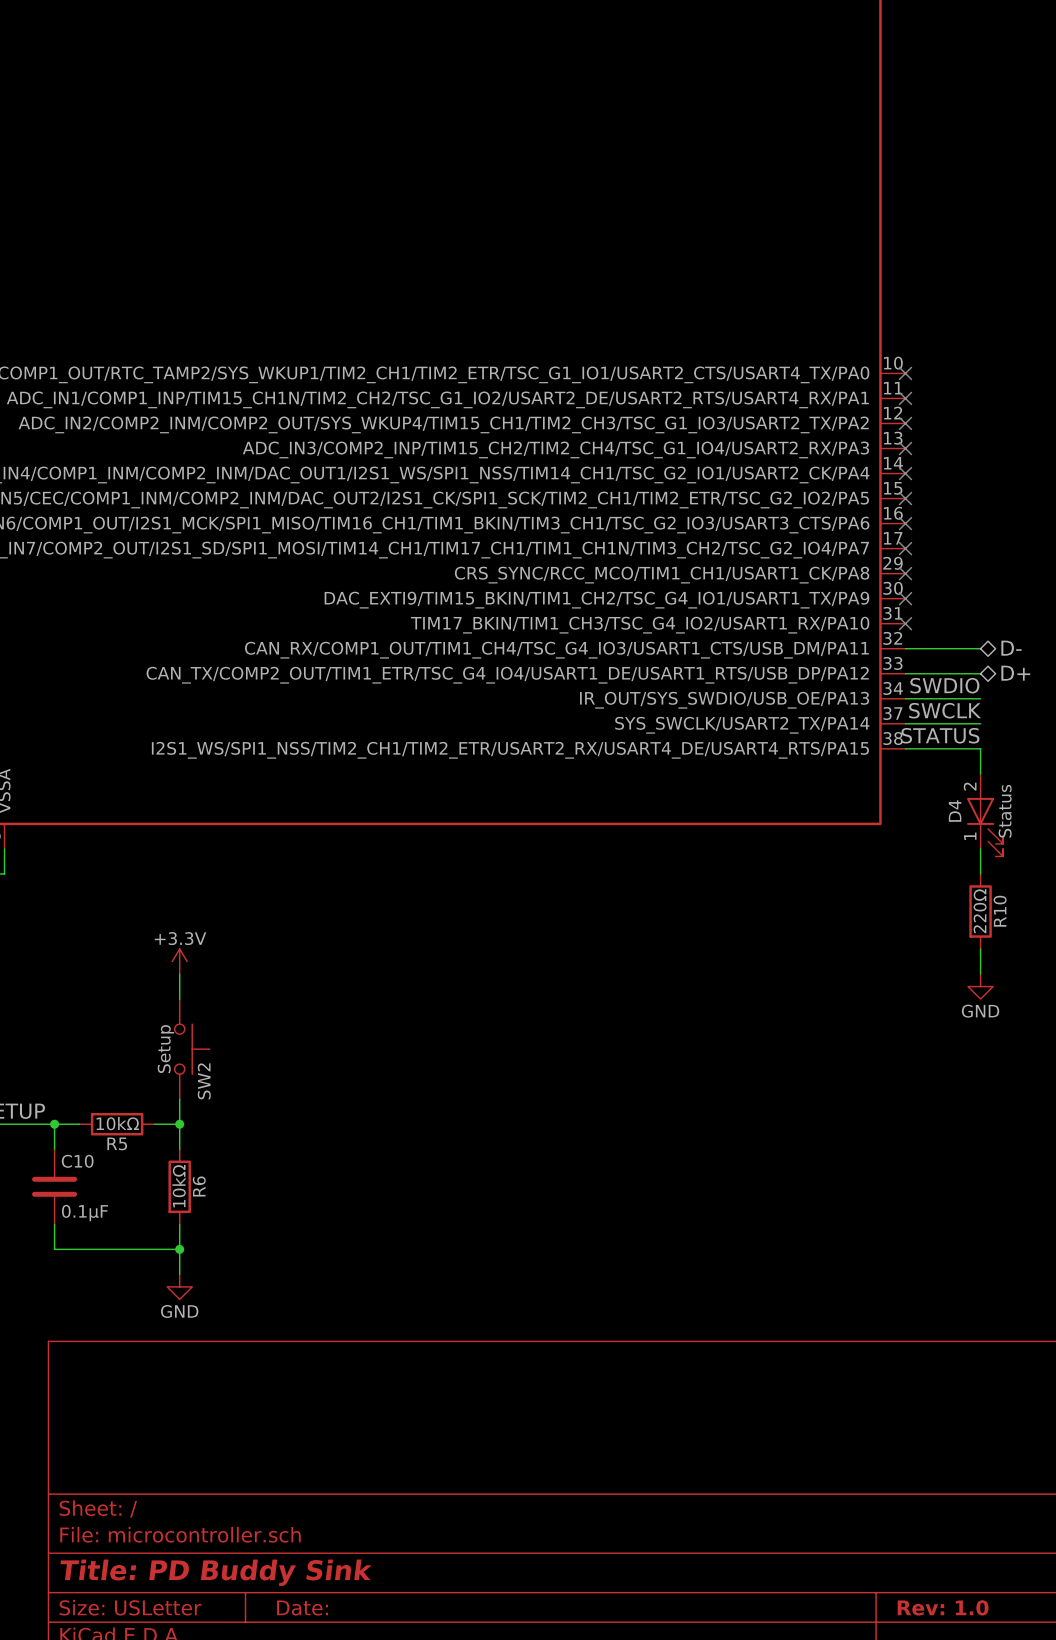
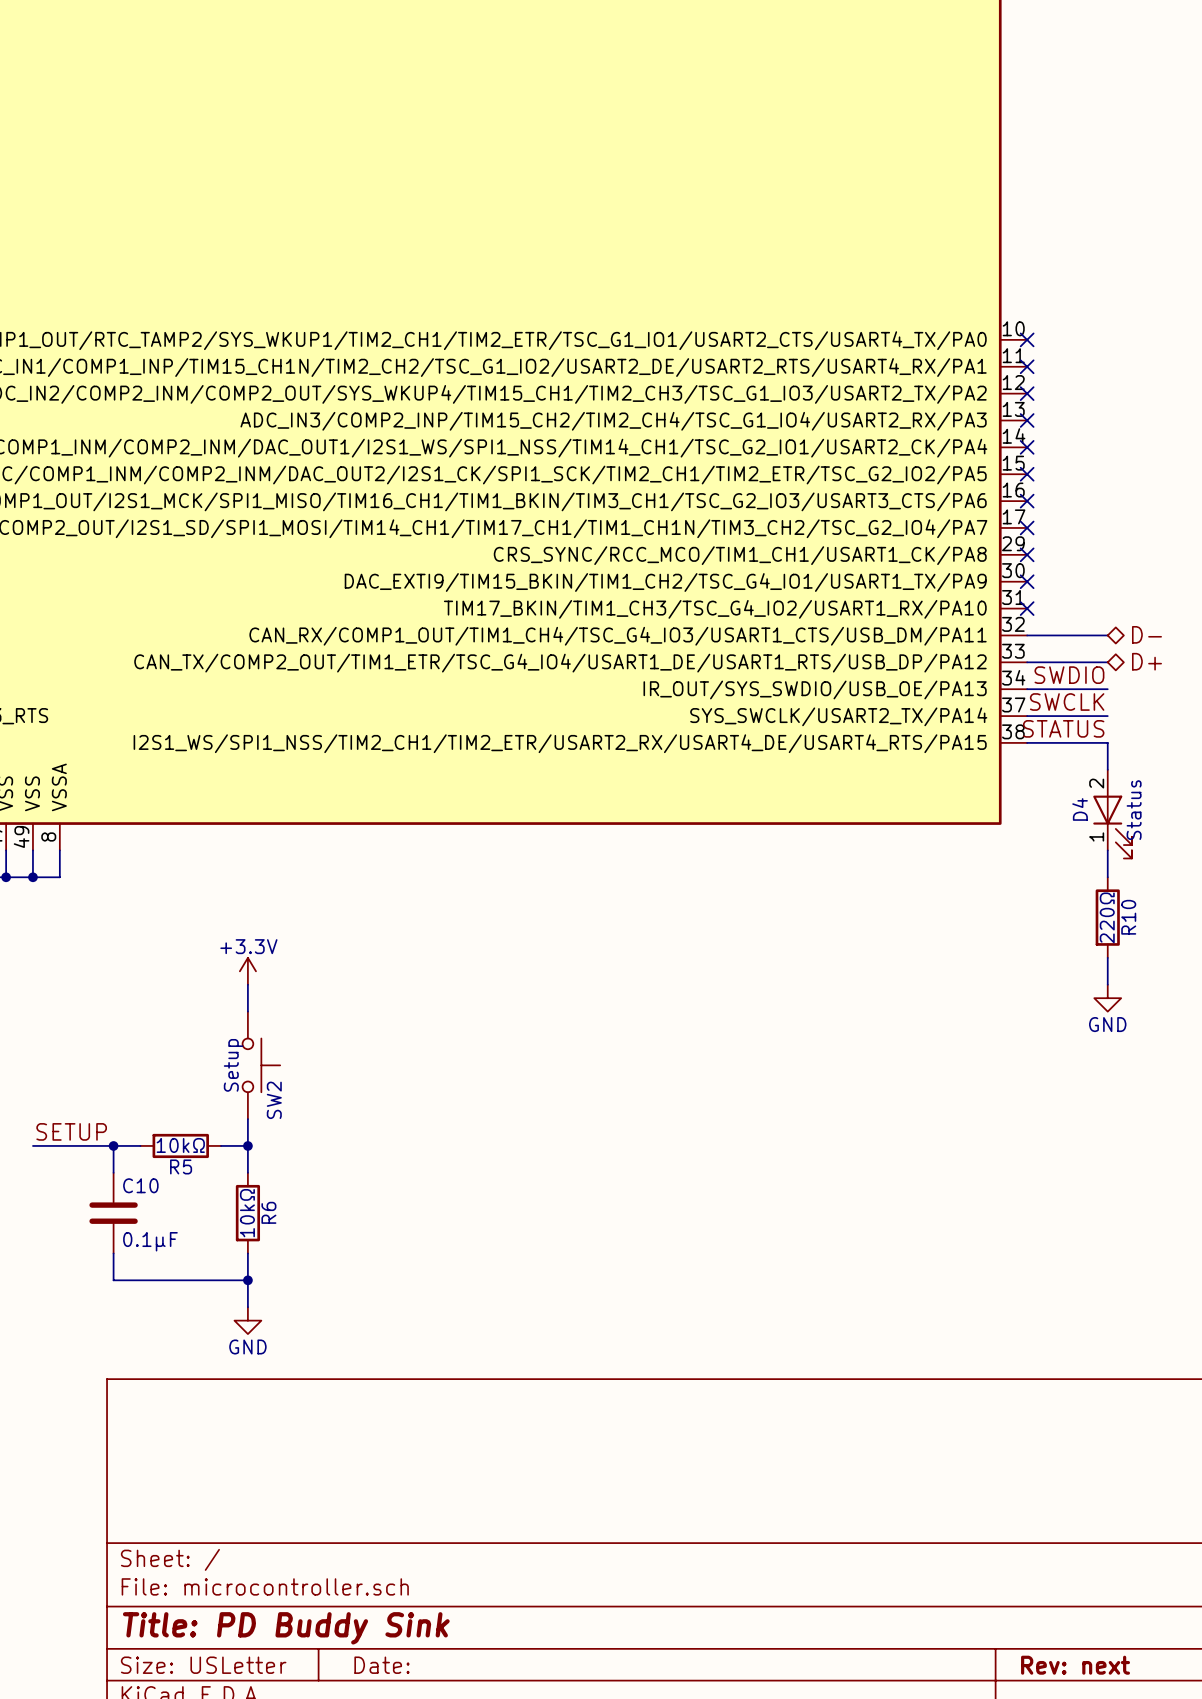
title block: Rev: 1.0 (943, 1607) -> Rev: next (1075, 1665)

